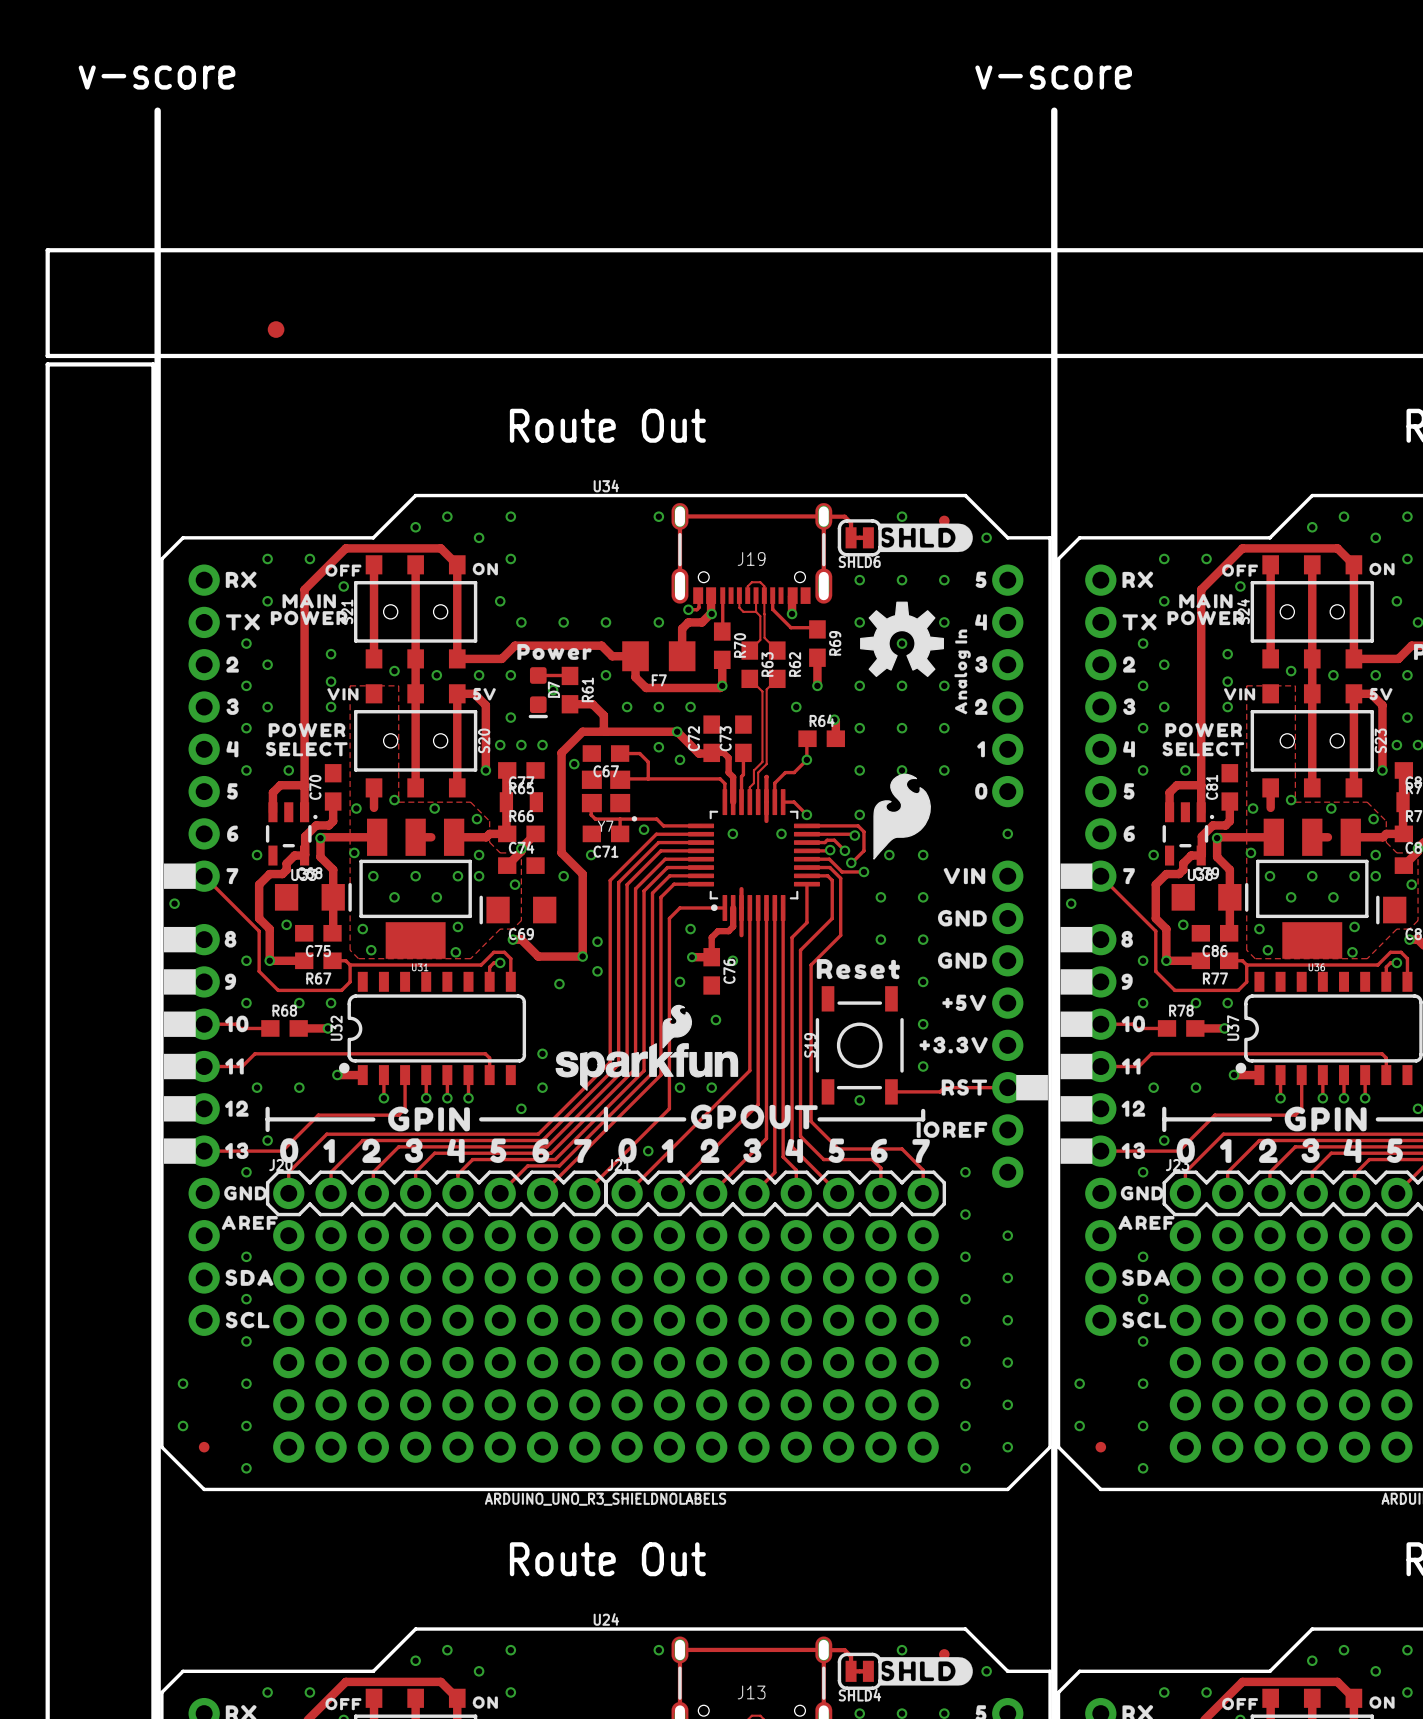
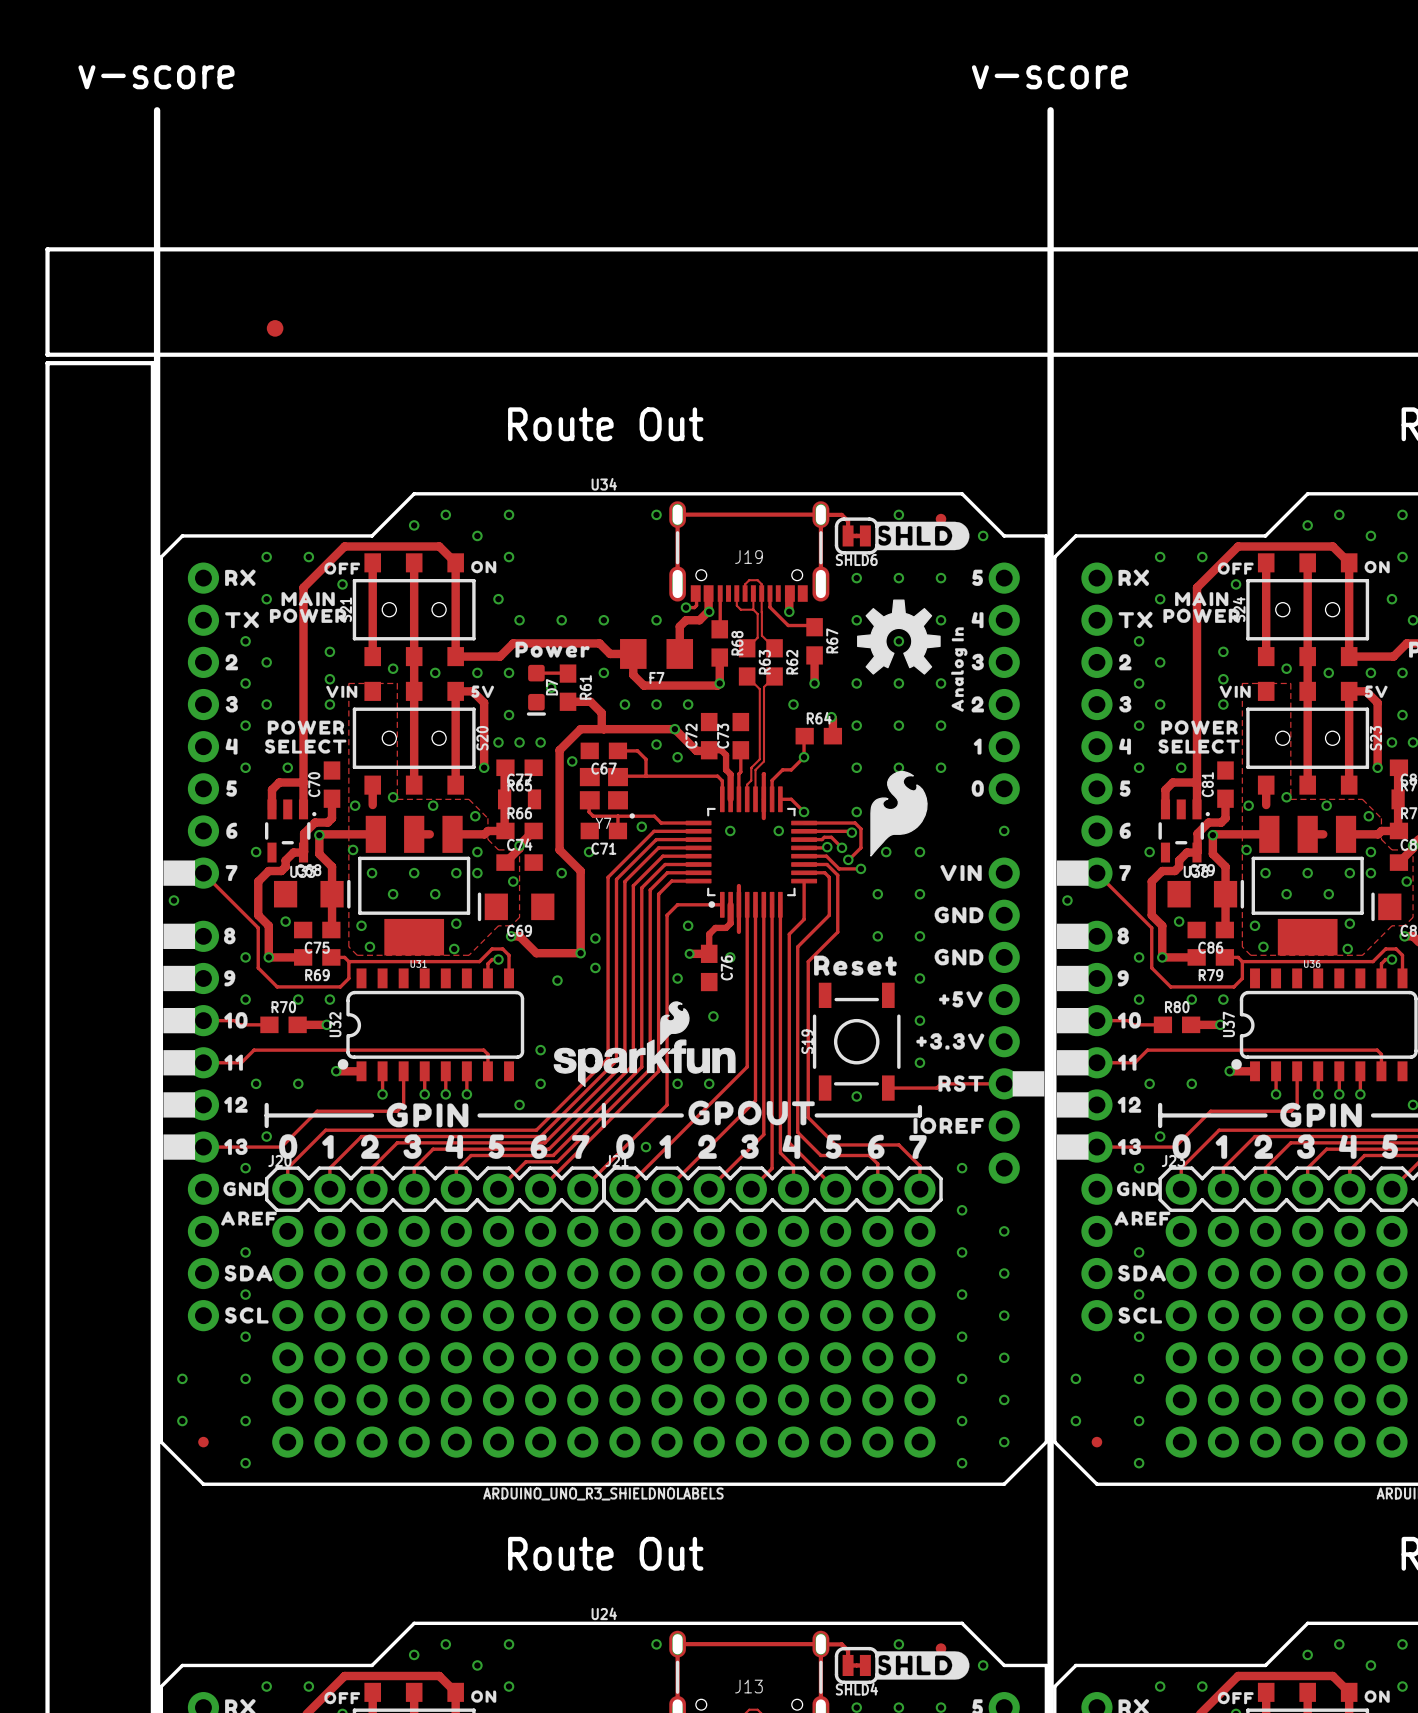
R69 name: R69 (835, 643) -> R67 (832, 640)
R70 name: R70 (740, 645) -> R68 (737, 643)
R67 name: R67 (318, 978) -> R69 (317, 975)
R77 name: R77 (1215, 978) -> R79 (1210, 975)
R68 name: R68 (284, 1010) -> R70 (283, 1007)
R78 name: R78 (1181, 1010) -> R80 (1177, 1007)

